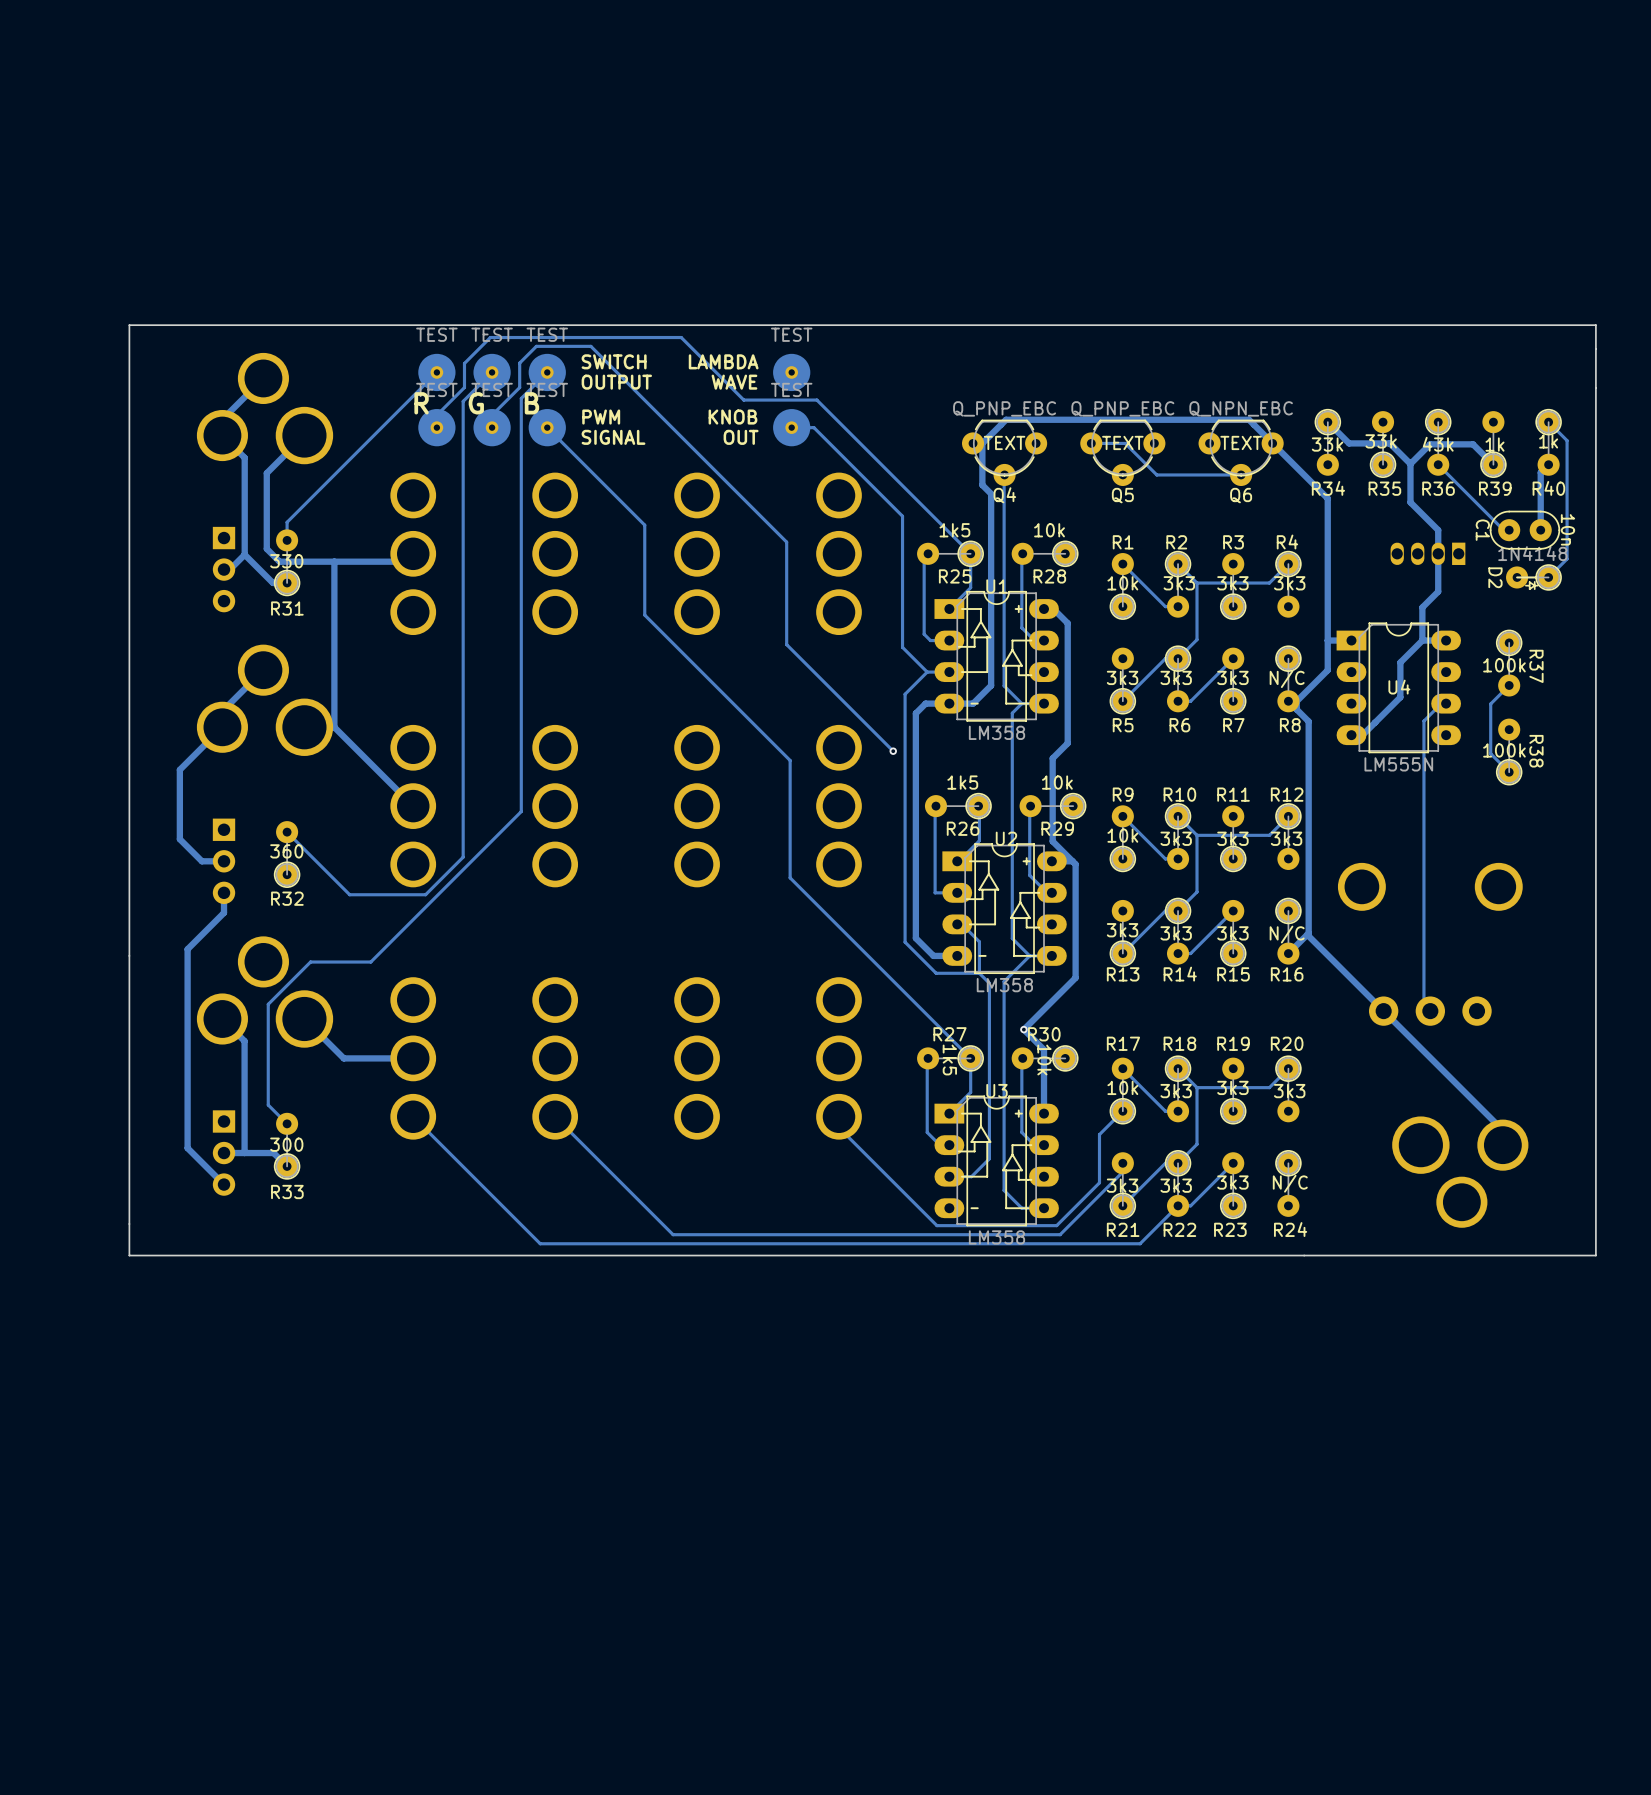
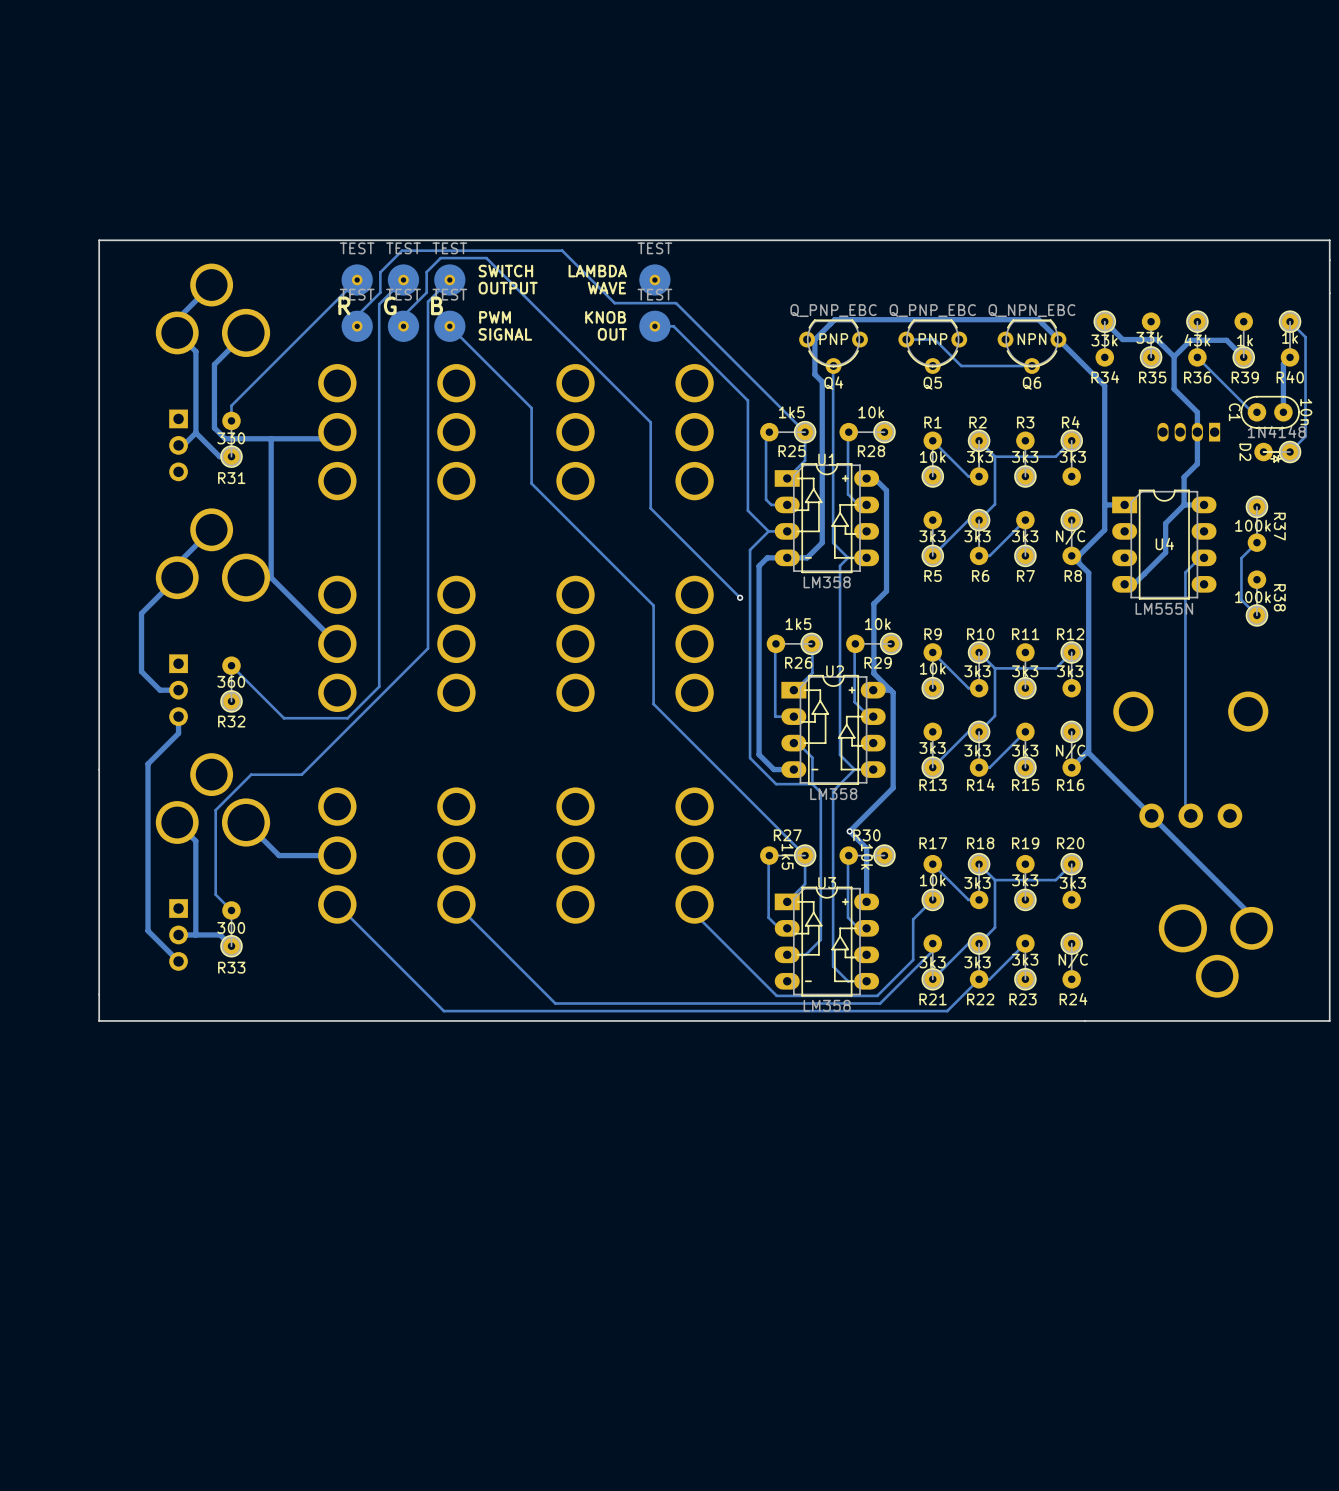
Q4 footprint: [962, 419, 1048, 487] -> [799, 319, 868, 374]
Q5 footprint: [1080, 419, 1166, 487] -> [898, 319, 968, 374]
Q6 footprint: [1198, 419, 1284, 487] -> [997, 319, 1067, 374]

